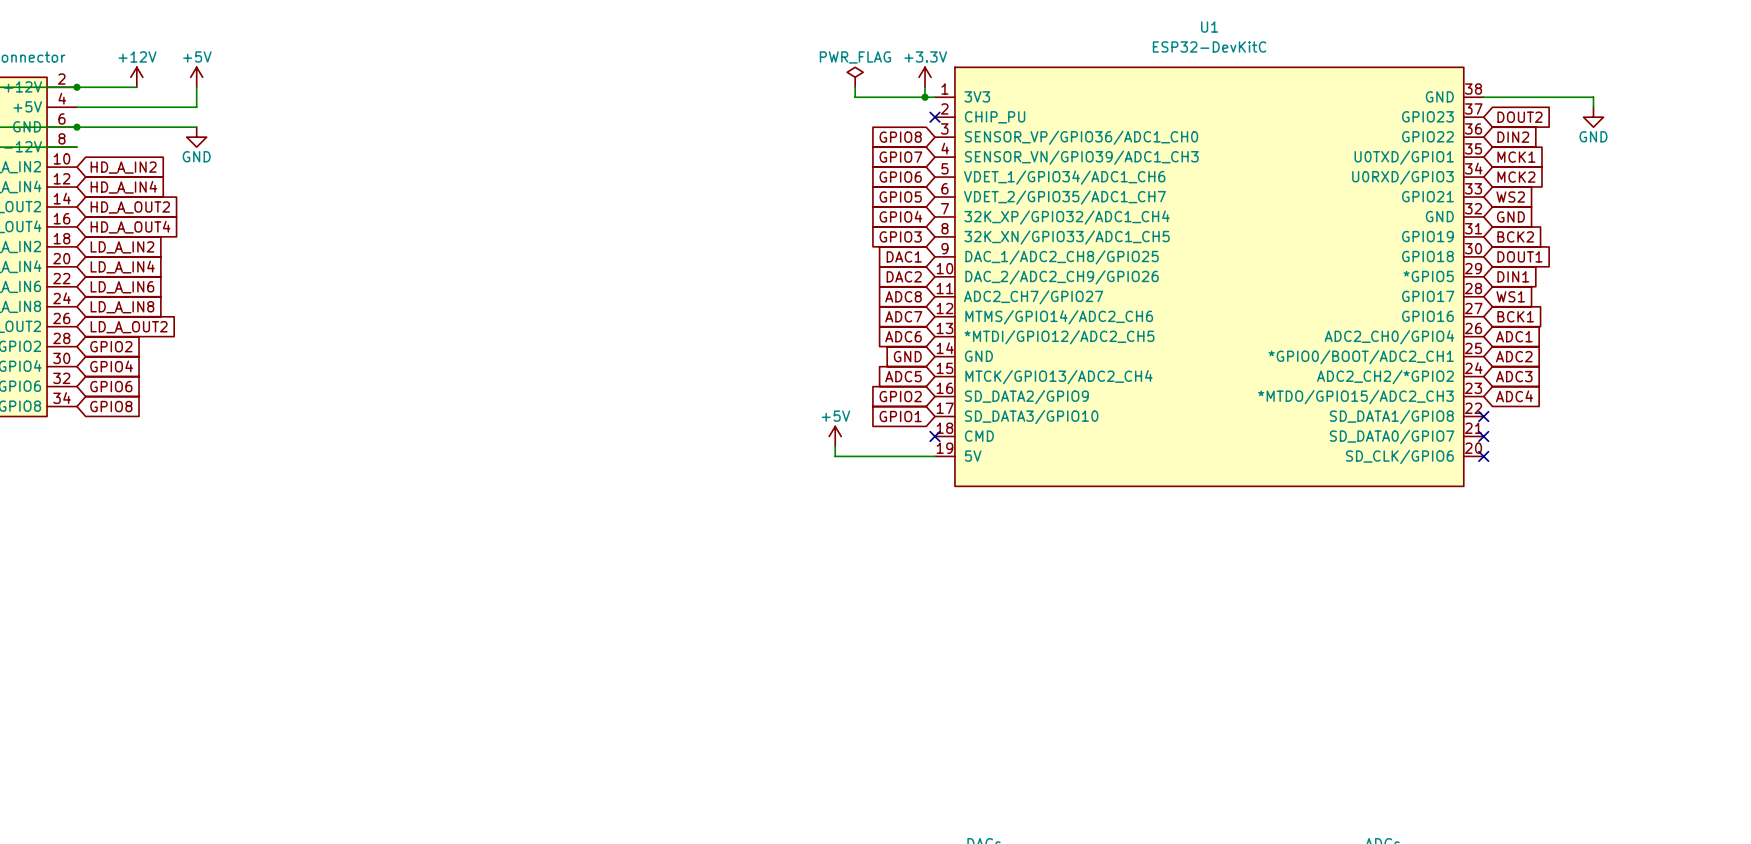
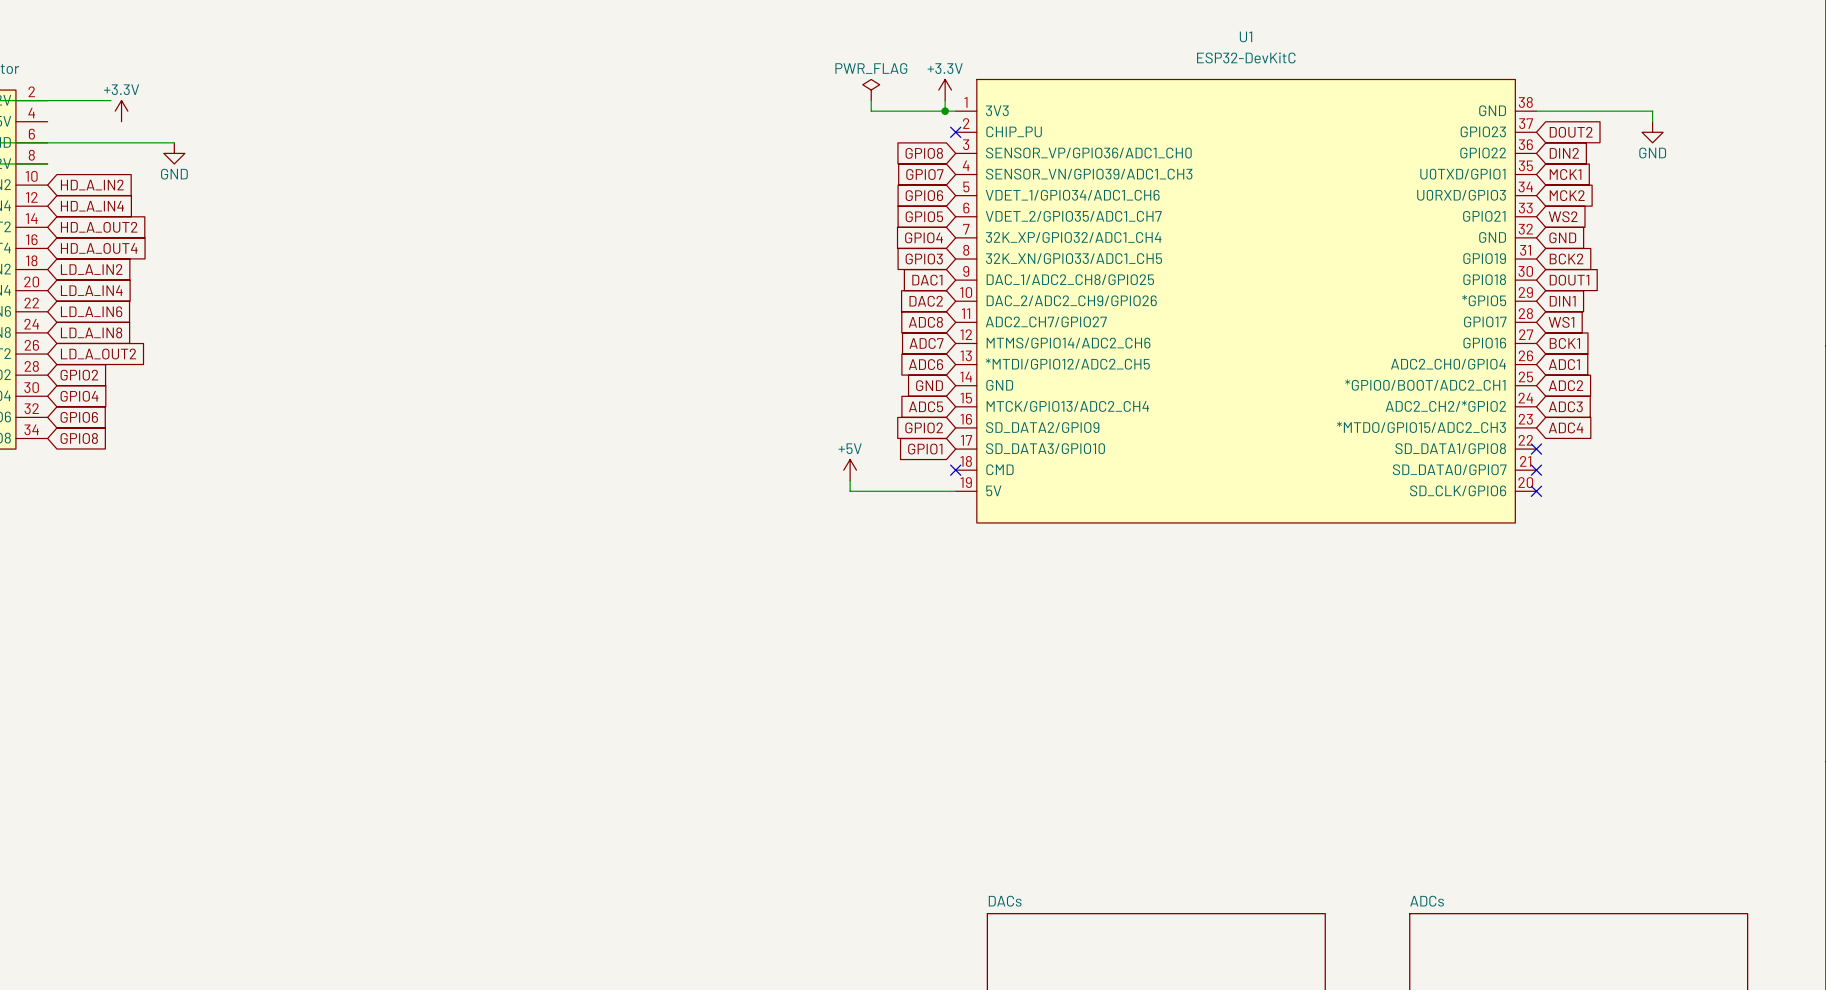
power symbol: +12V (136, 77) -> none
power symbol: +5V (196, 77) -> none
junction: (76, 87) -> none
wire: (196, 87) (196, 107) (76, 107) -> none
power symbol: none -> +3.3V (121, 111)
junction: (76, 127) -> none

